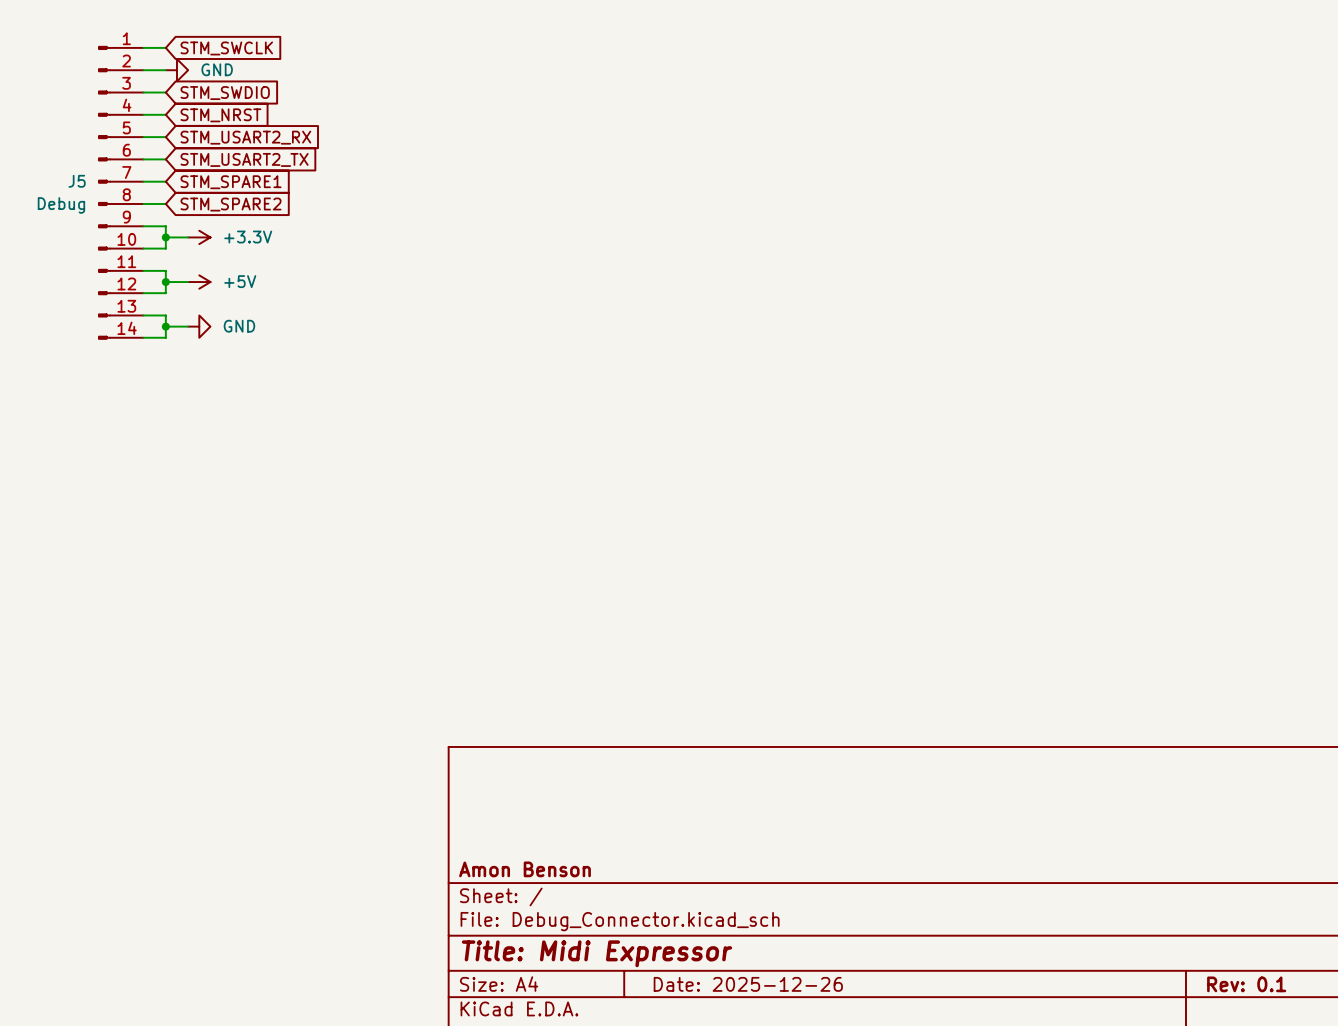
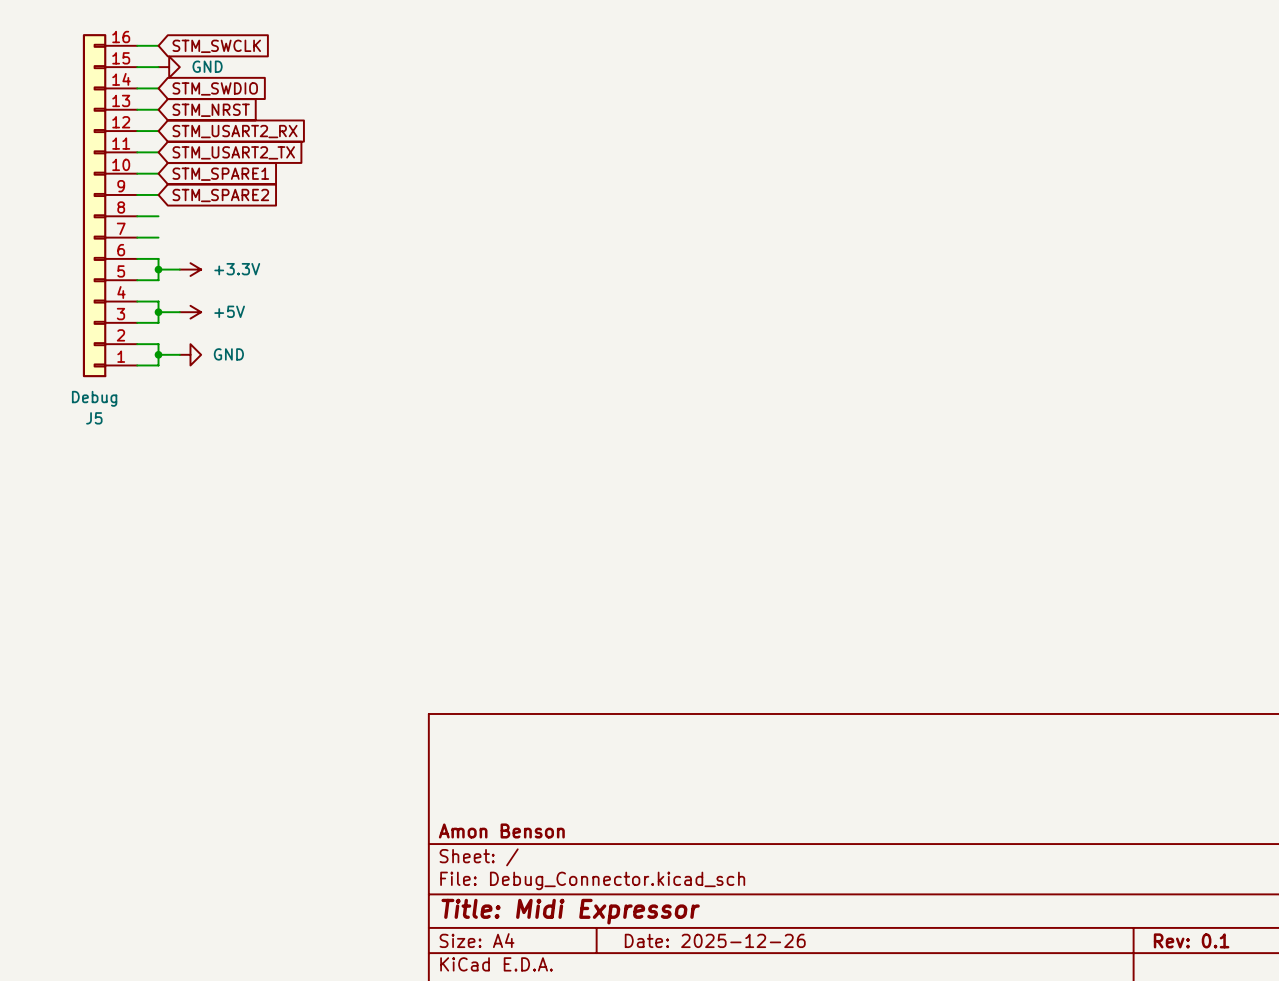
J5 symbol: [98, 46, 144, 340] -> [82, 34, 138, 378]
J5 name position: J5 (77, 181) -> J5 (94, 418)
J5 value position: Debug (61, 205) -> Debug (94, 398)
wire: (165, 226) (165, 248) -> none
wire: (165, 237) (188, 237) -> (158, 354) (179, 354)
junction: (165, 237) -> none
power symbol: +3.3V (199, 237) -> none
power symbol: +5V (199, 282) -> +3.3V (190, 269)
power symbol: GND (199, 326) -> +5V (190, 312)
wire: none -> (137, 344) (158, 344) (158, 365) (137, 365)
junction: none -> (158, 354)
power symbol: none -> GND (190, 354)

